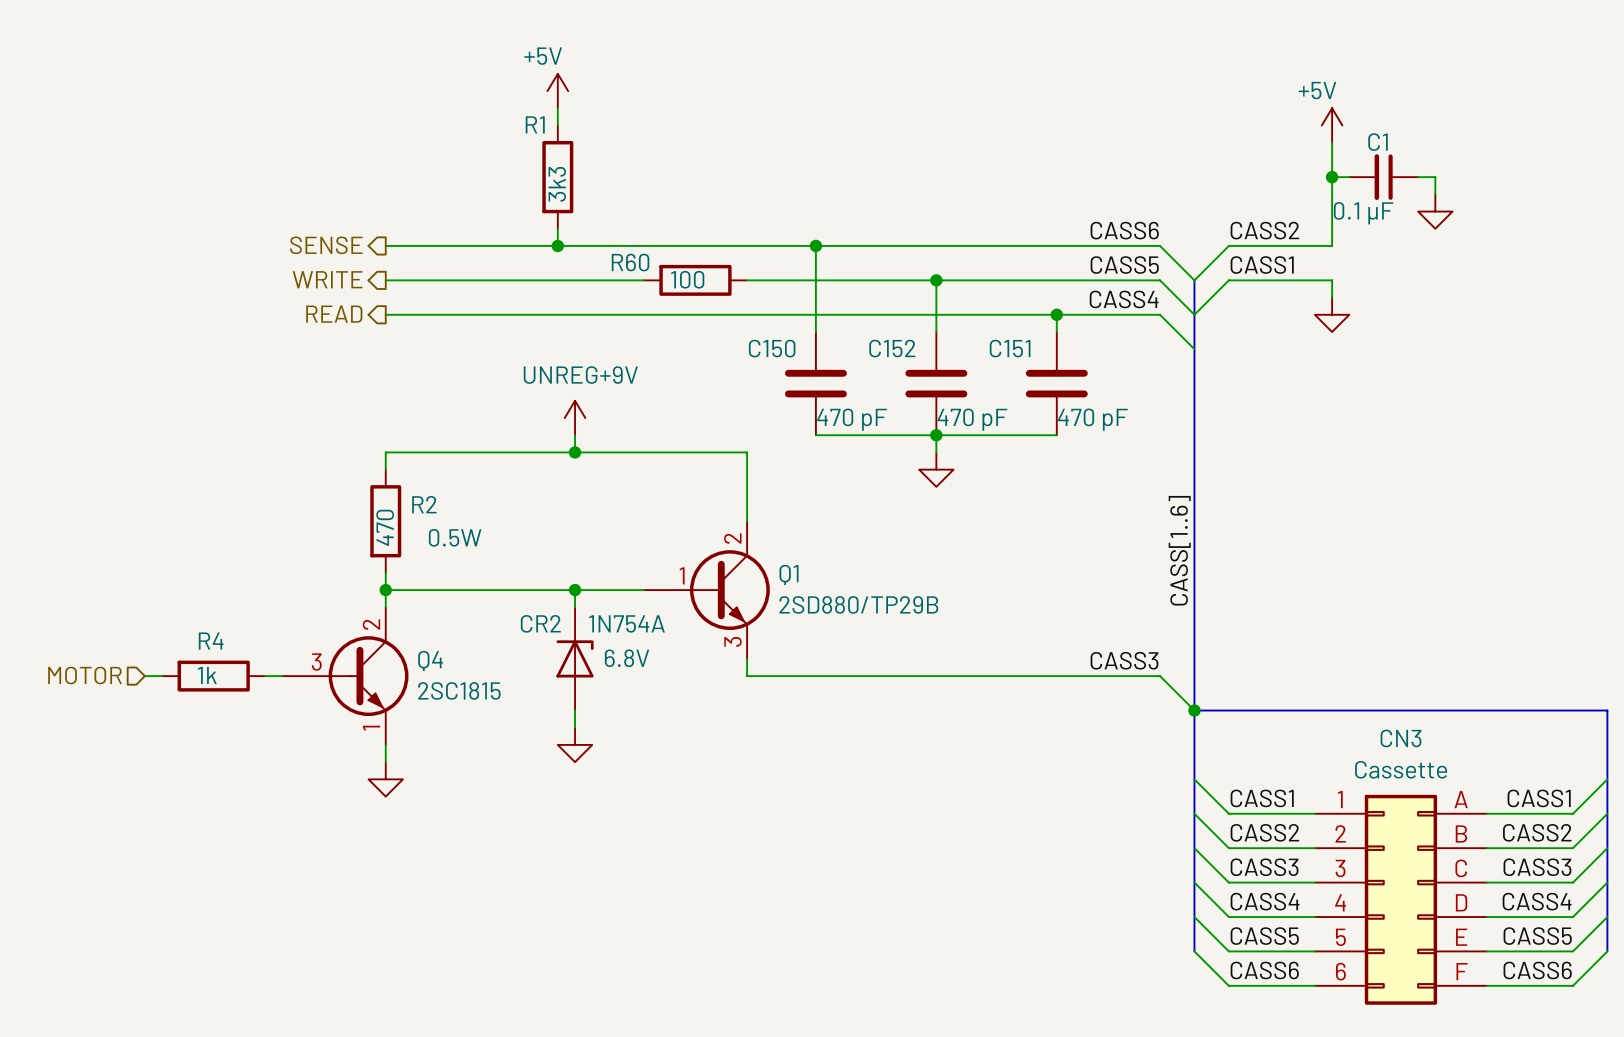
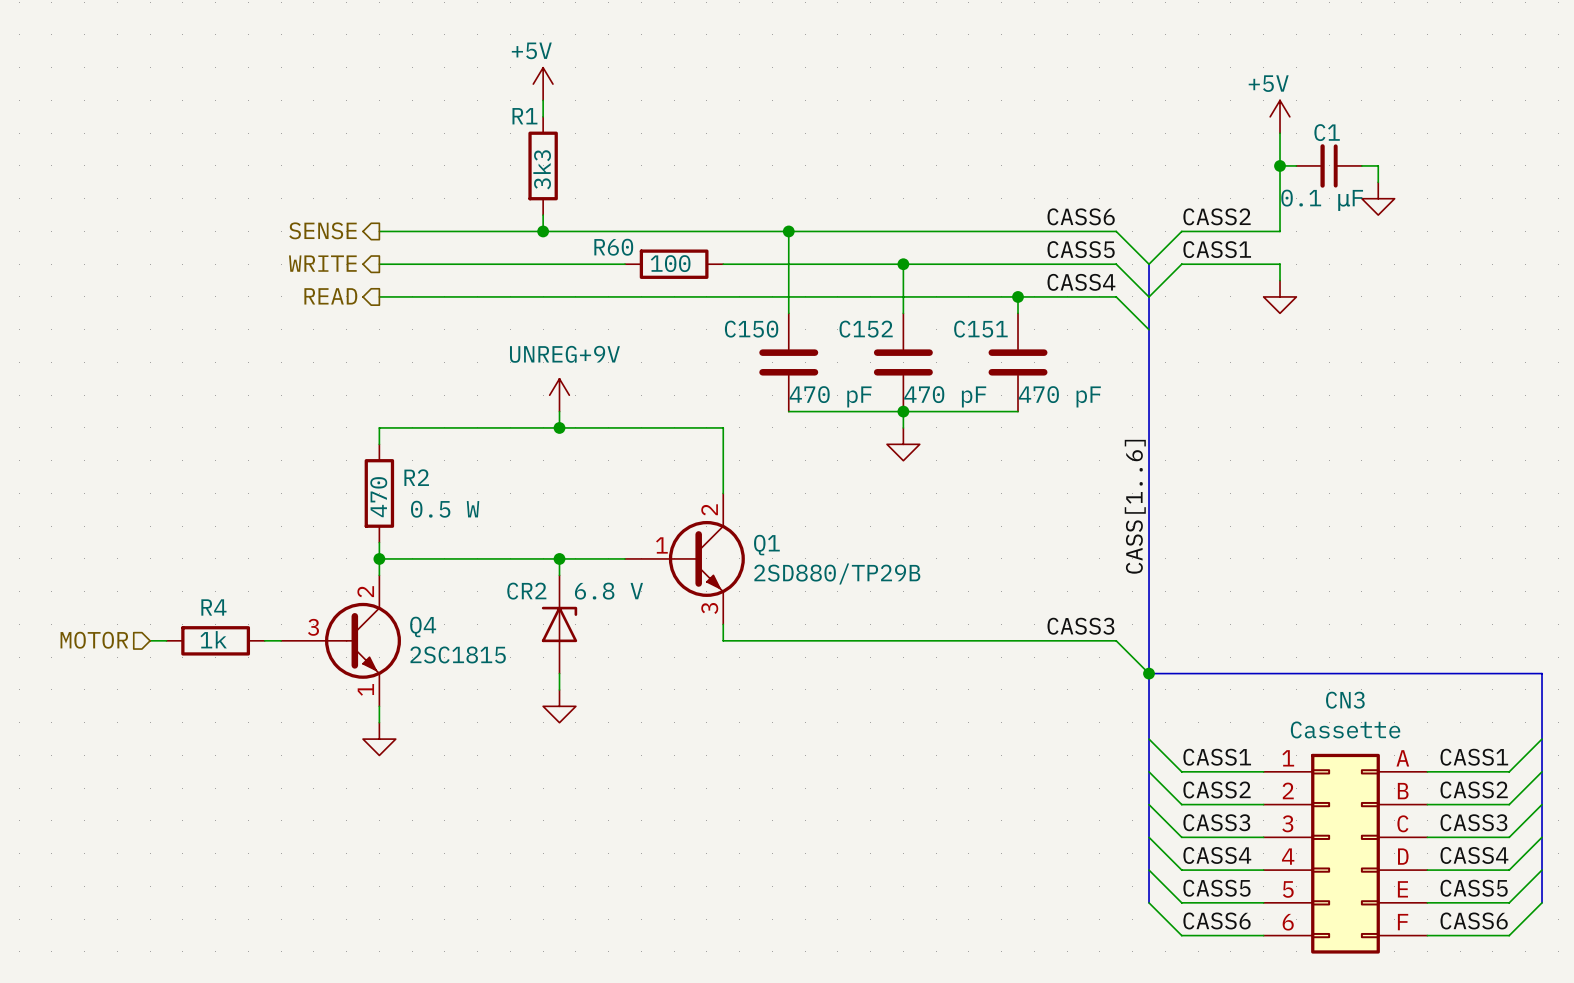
R2 text: 0.5W (455, 537) -> 0.5 W (445, 509)
CR2 value: 1N754A (626, 623) -> 6.8 V (608, 591)
CR2 text: 6.8V (627, 658) -> none

